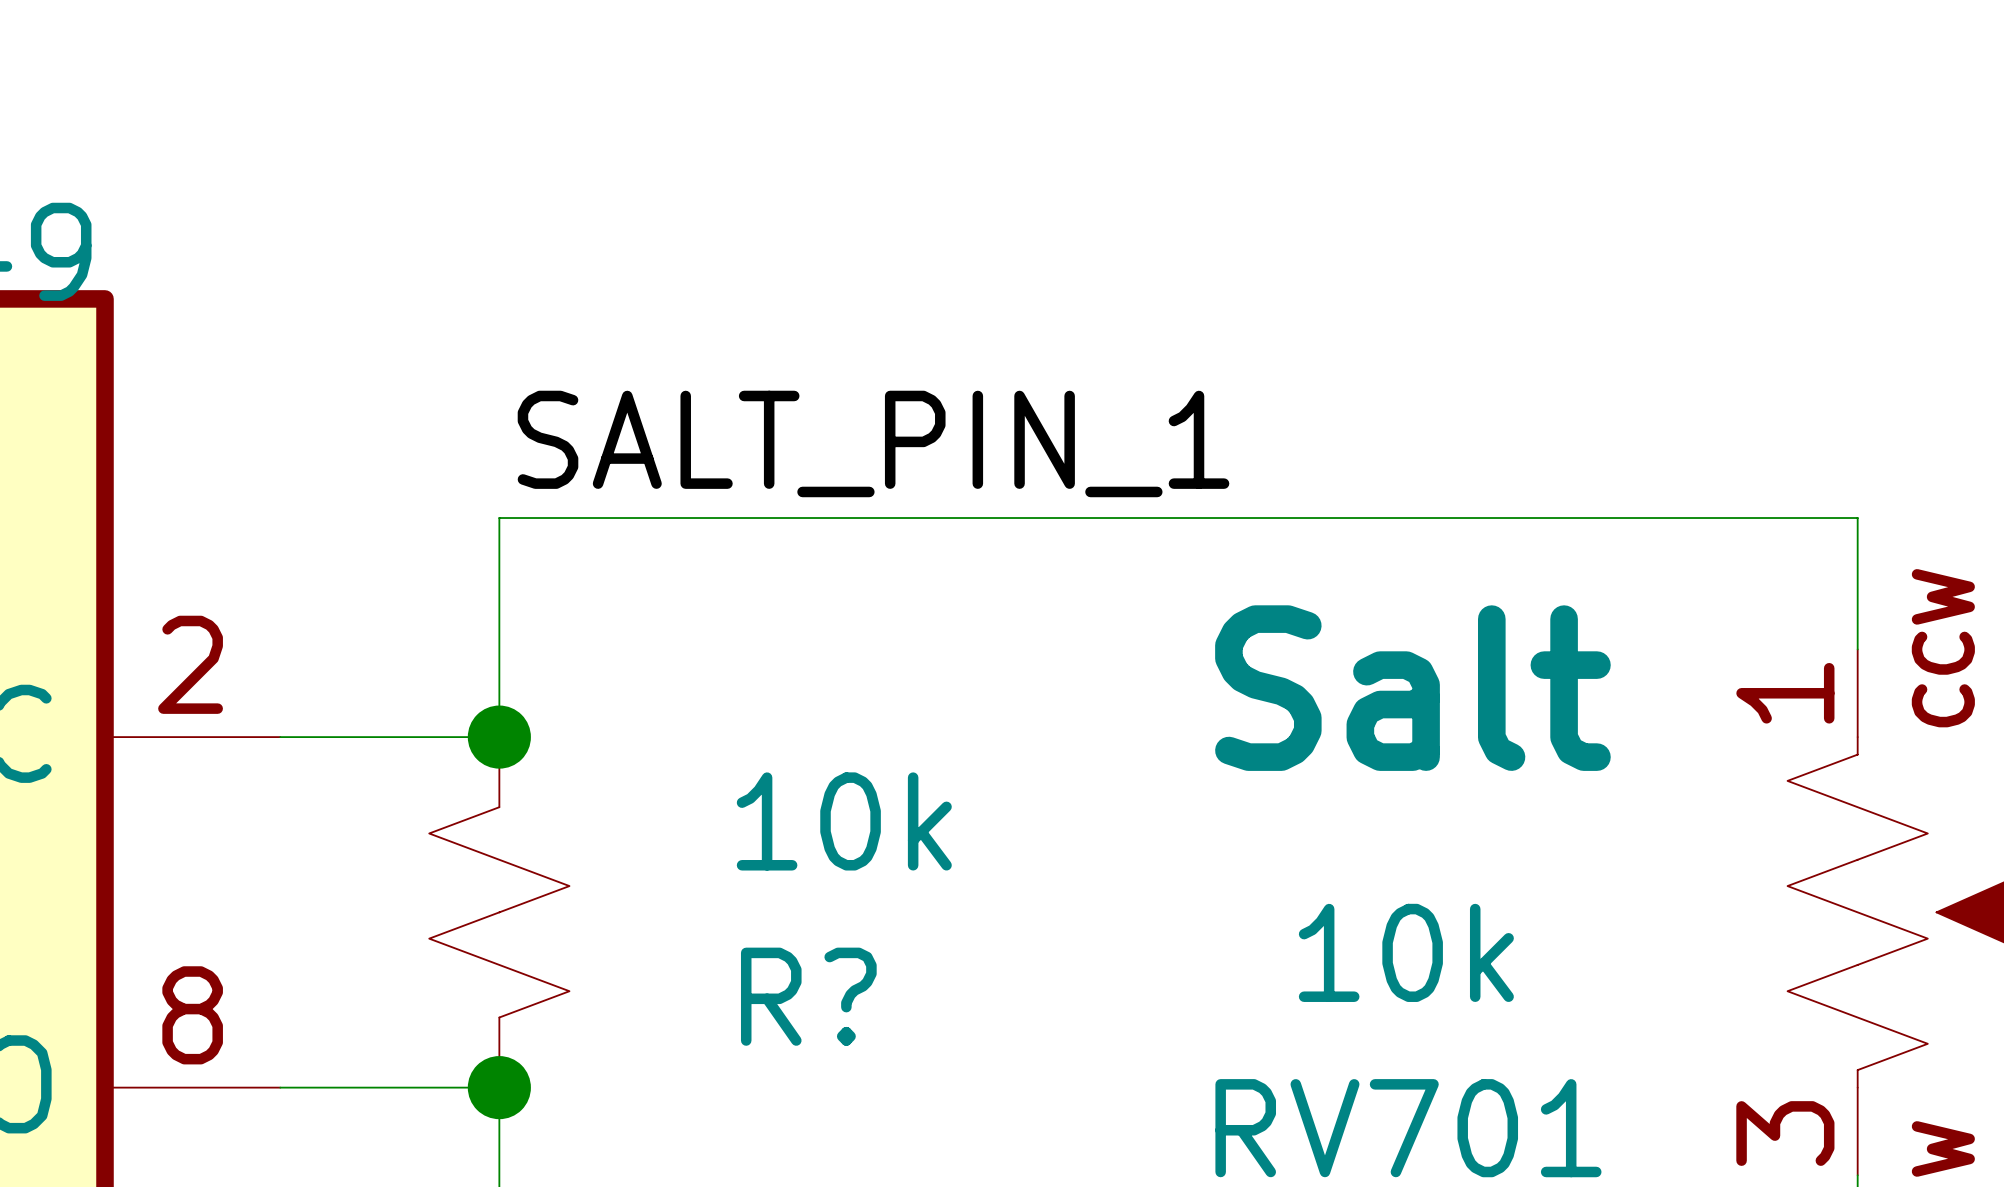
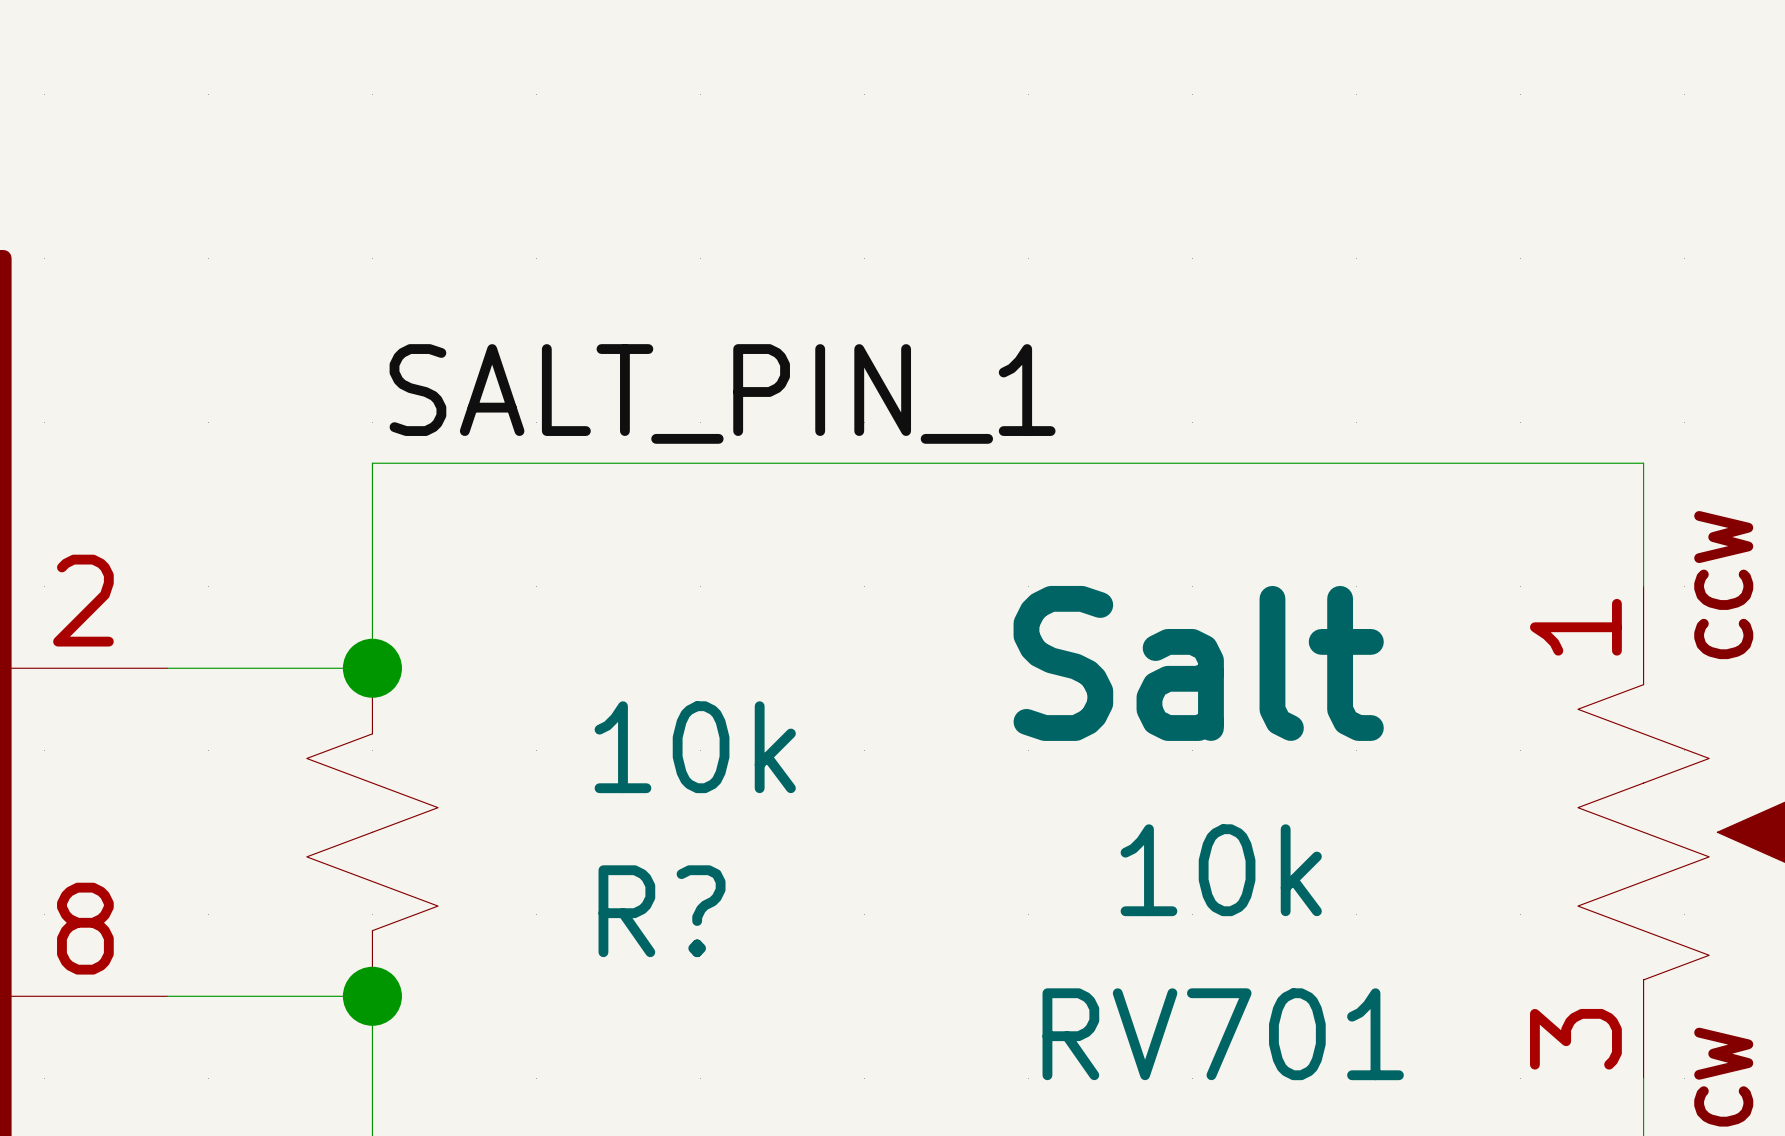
RV701 text position: Salt (1412, 688) -> Salt (1198, 663)

